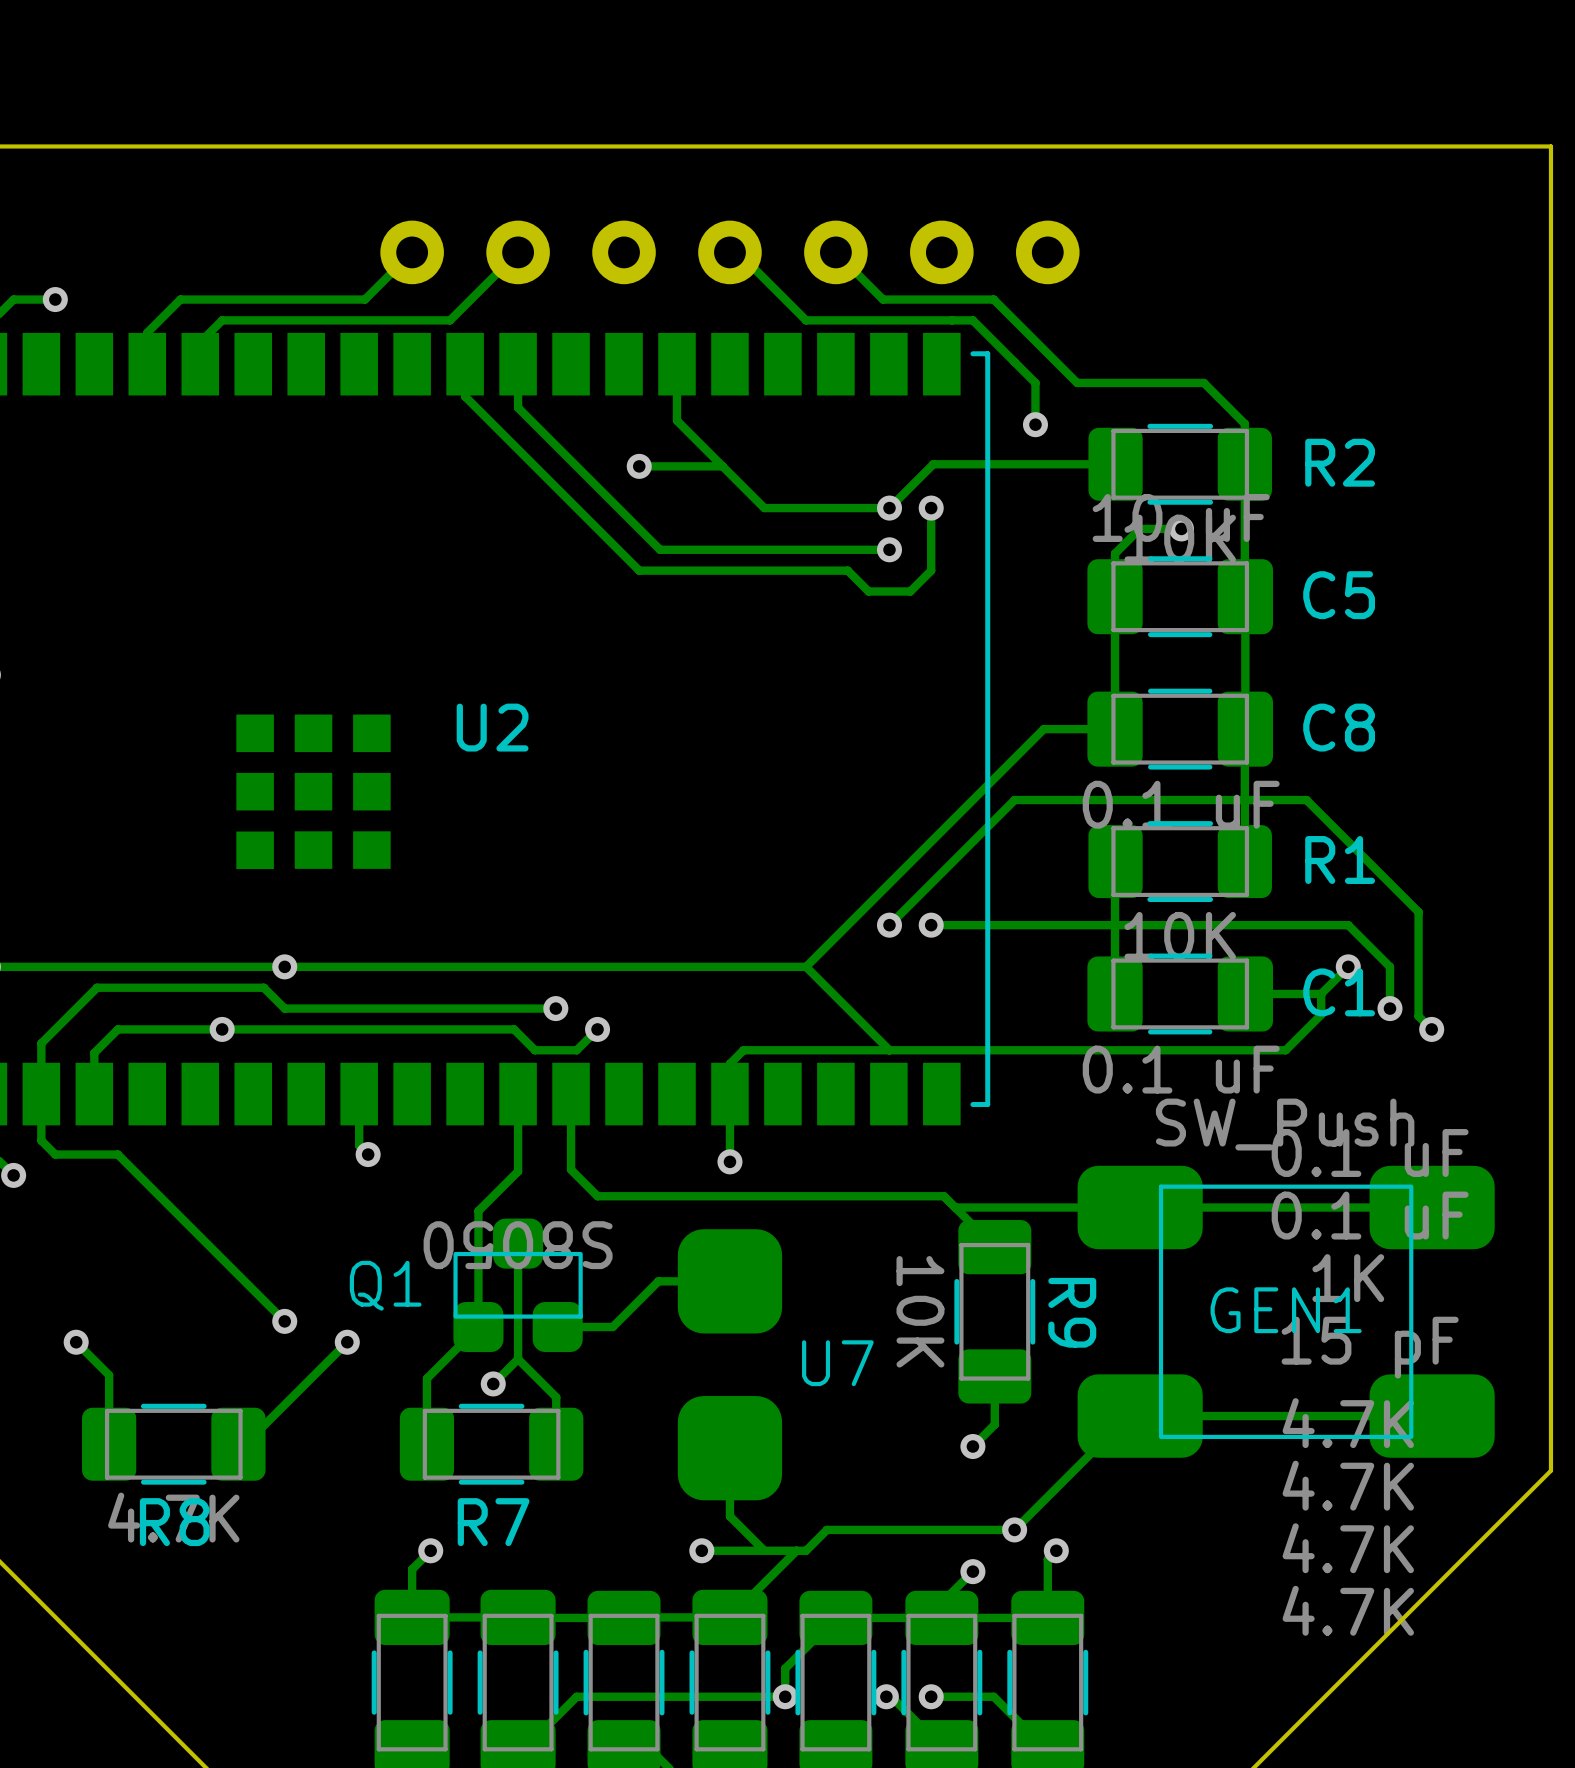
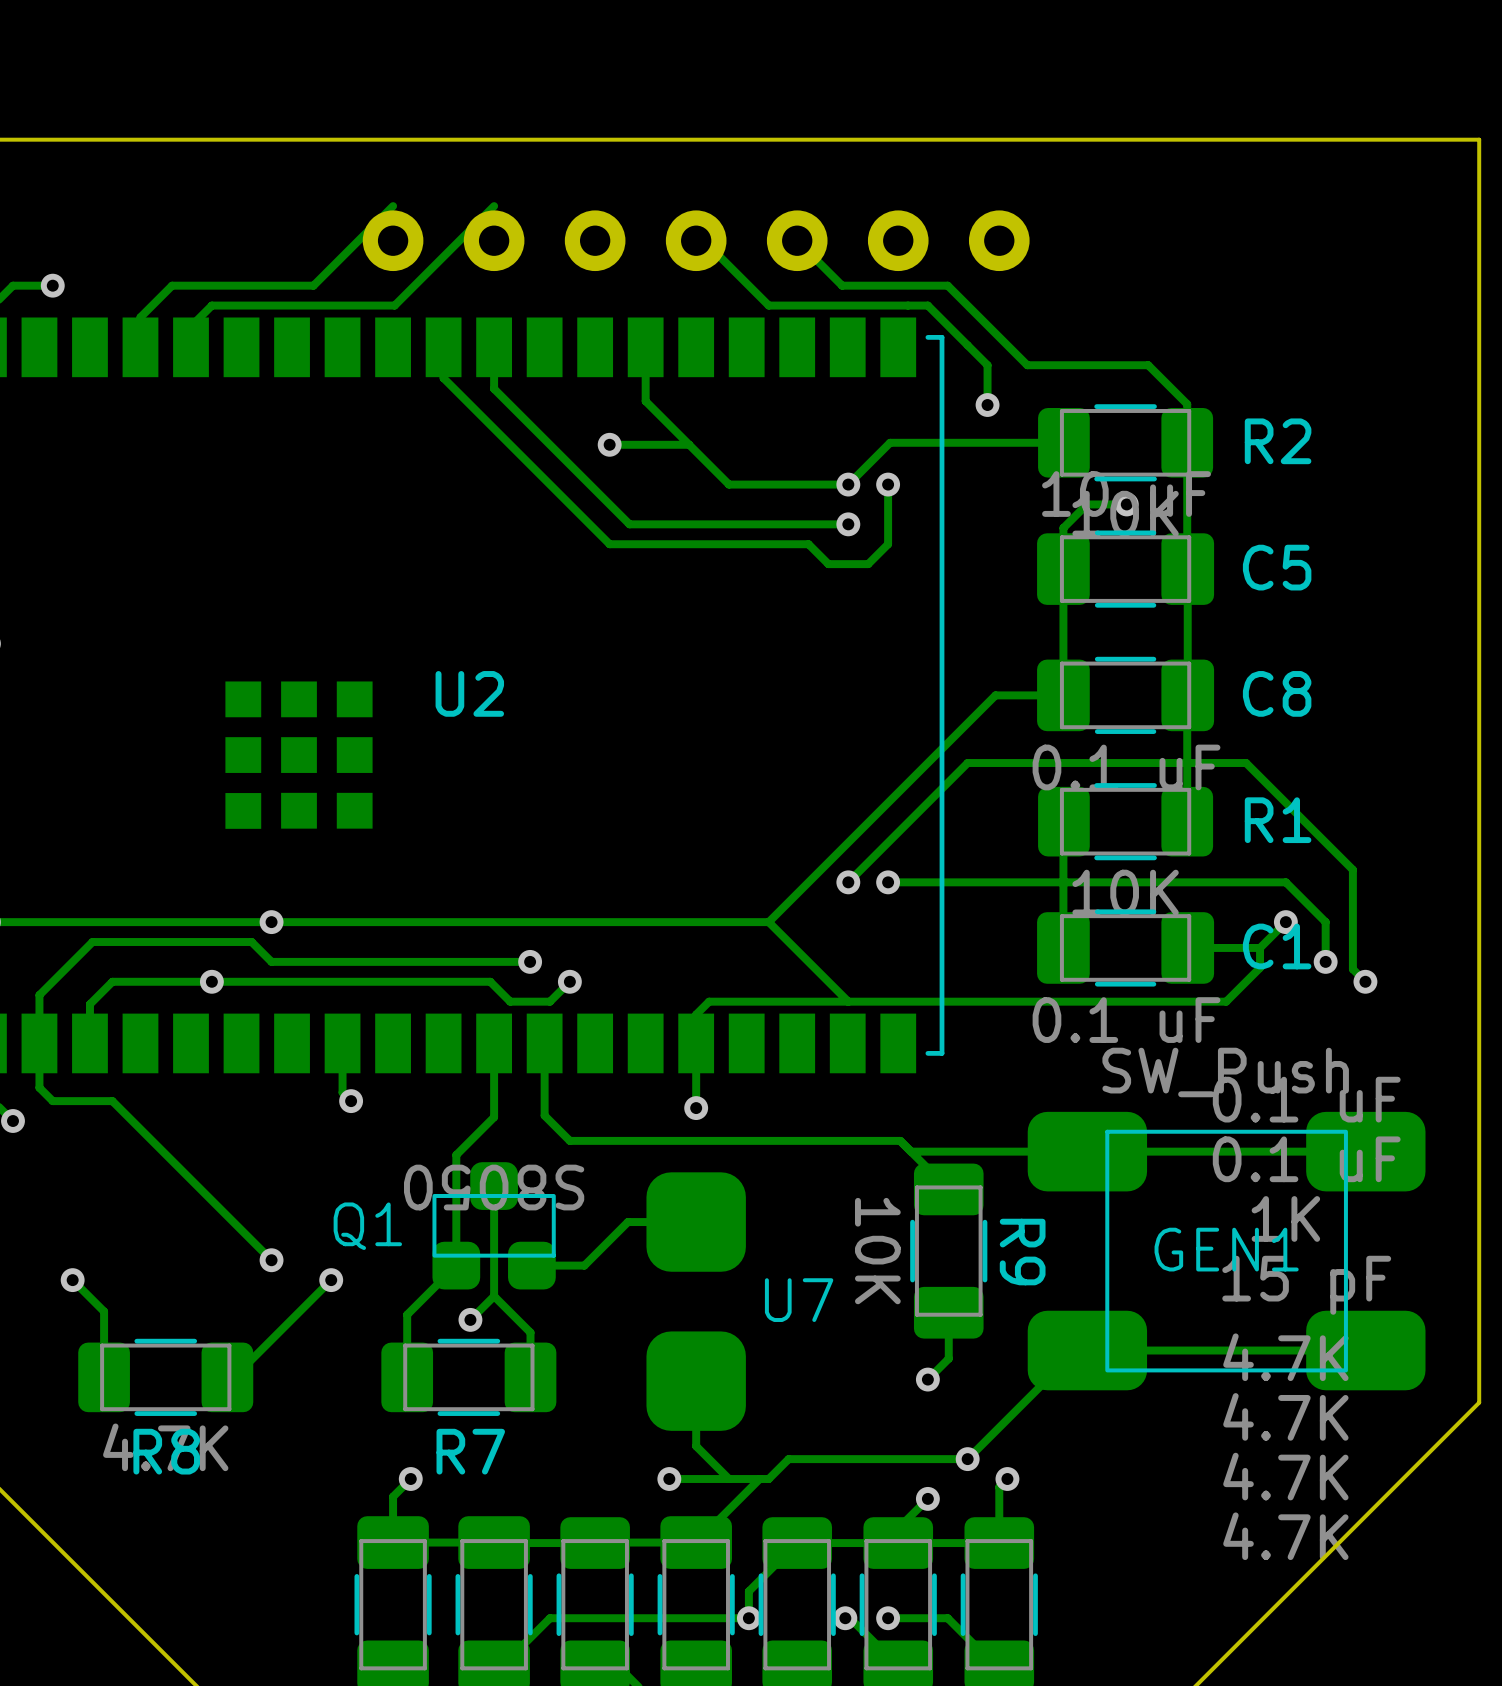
track: (412, 252) (365, 299) (328, 299) -> (393, 206) (313, 285)
track: (518, 252) (450, 320) (413, 320) -> (494, 206) (394, 305)

